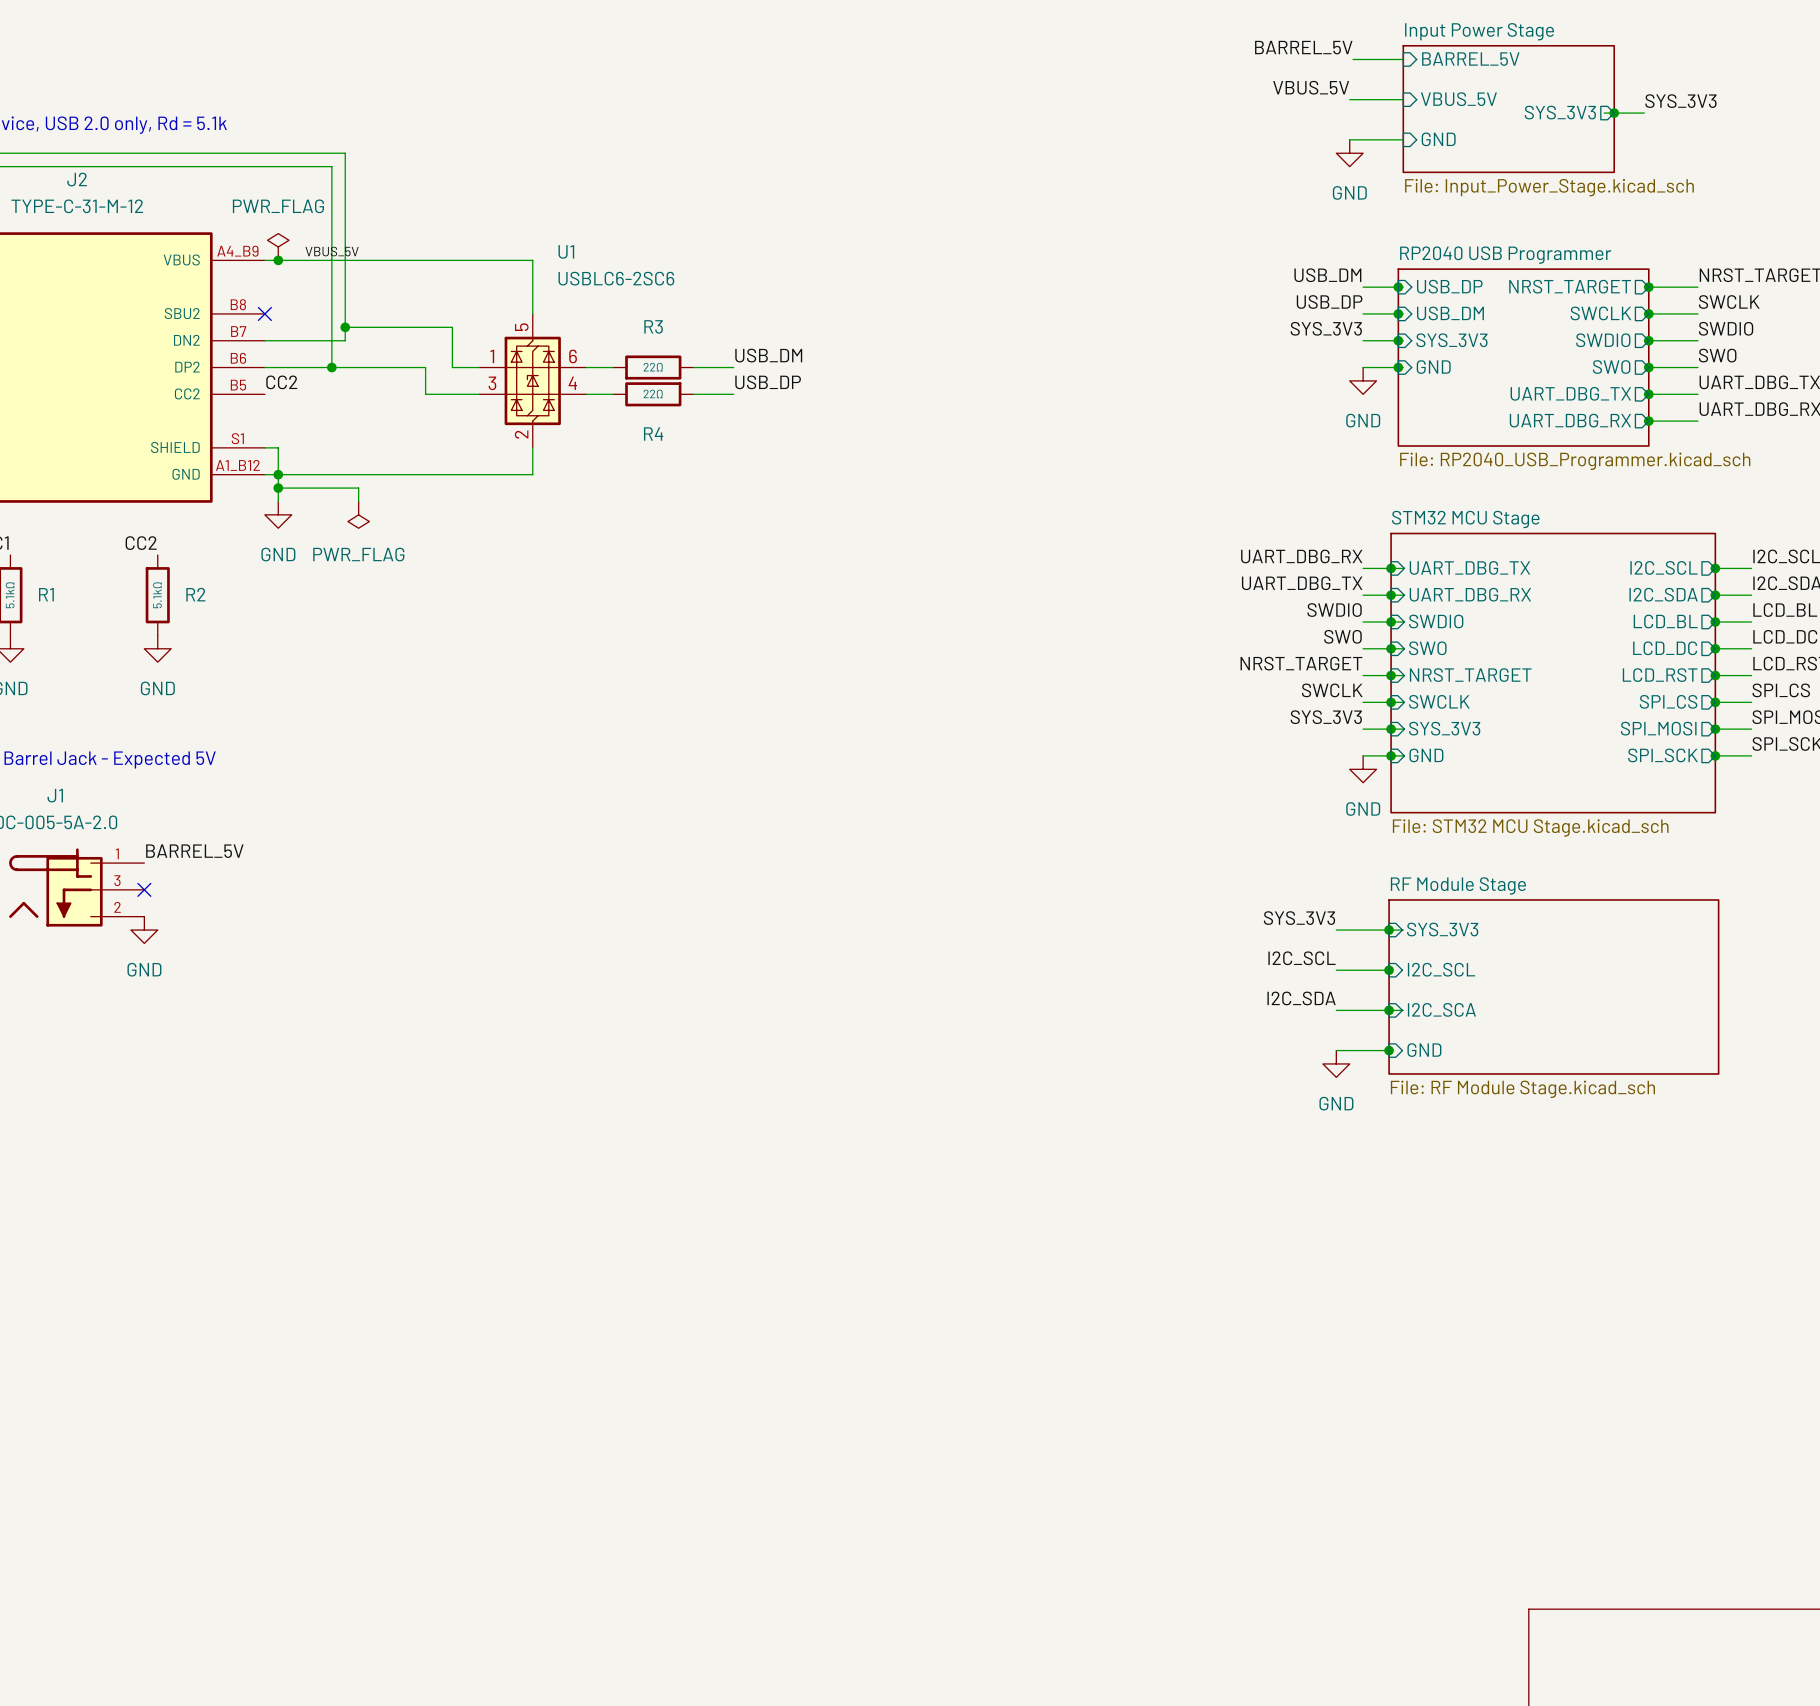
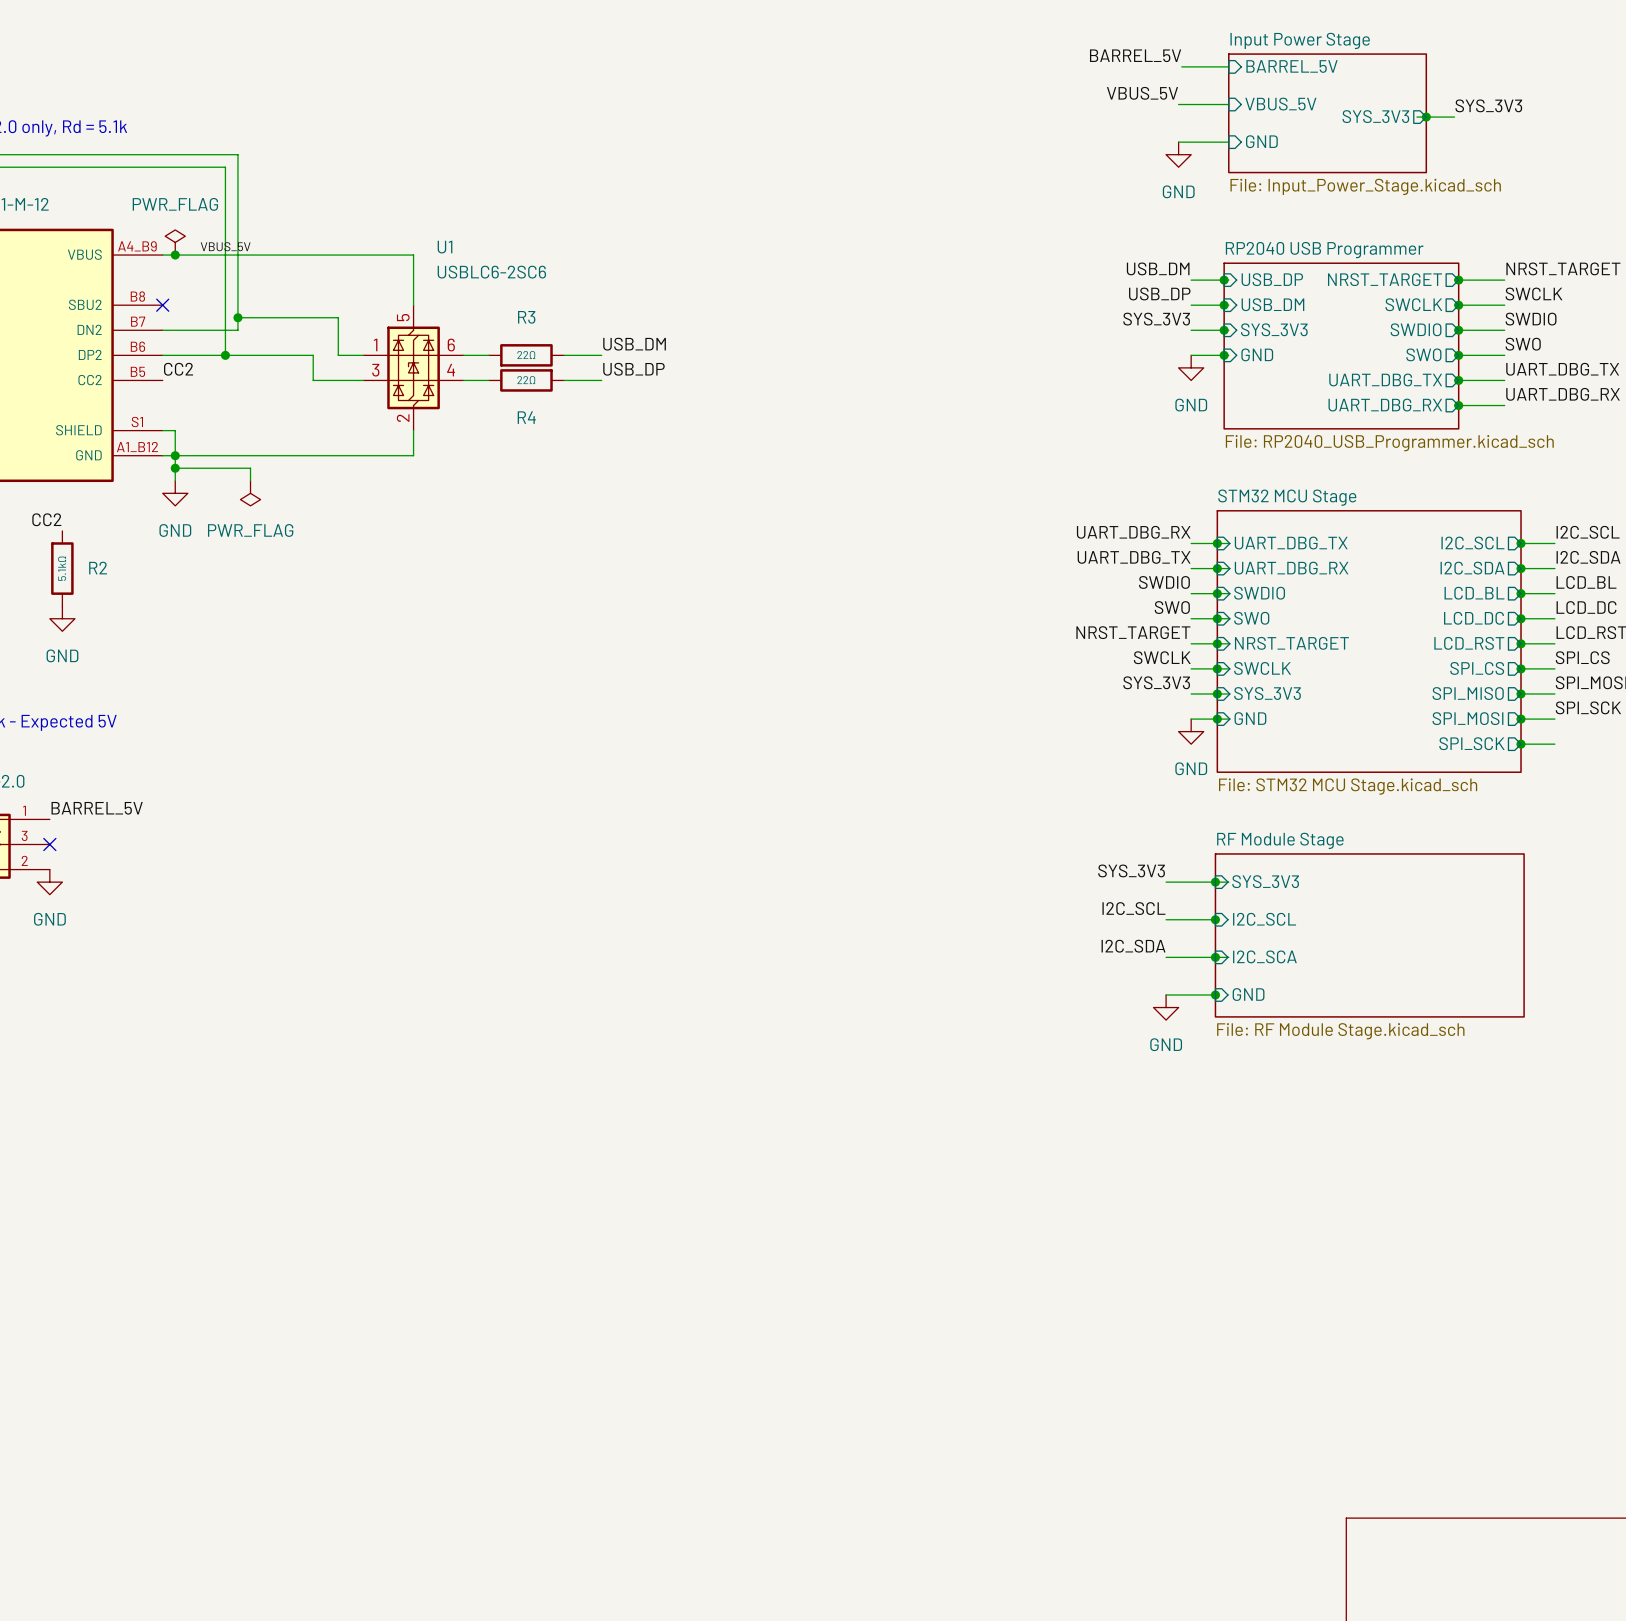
sheet pin: SPI_MOSI (1658, 728) -> SPI_MISO (1468, 693)
sheet pin: SPI_SCK (1662, 755) -> SPI_MOSI (1467, 718)
sheet pin: none -> SPI_SCK (1471, 743)
wire: none -> (1517, 744) (1554, 744)
junction: none -> (1521, 744)

